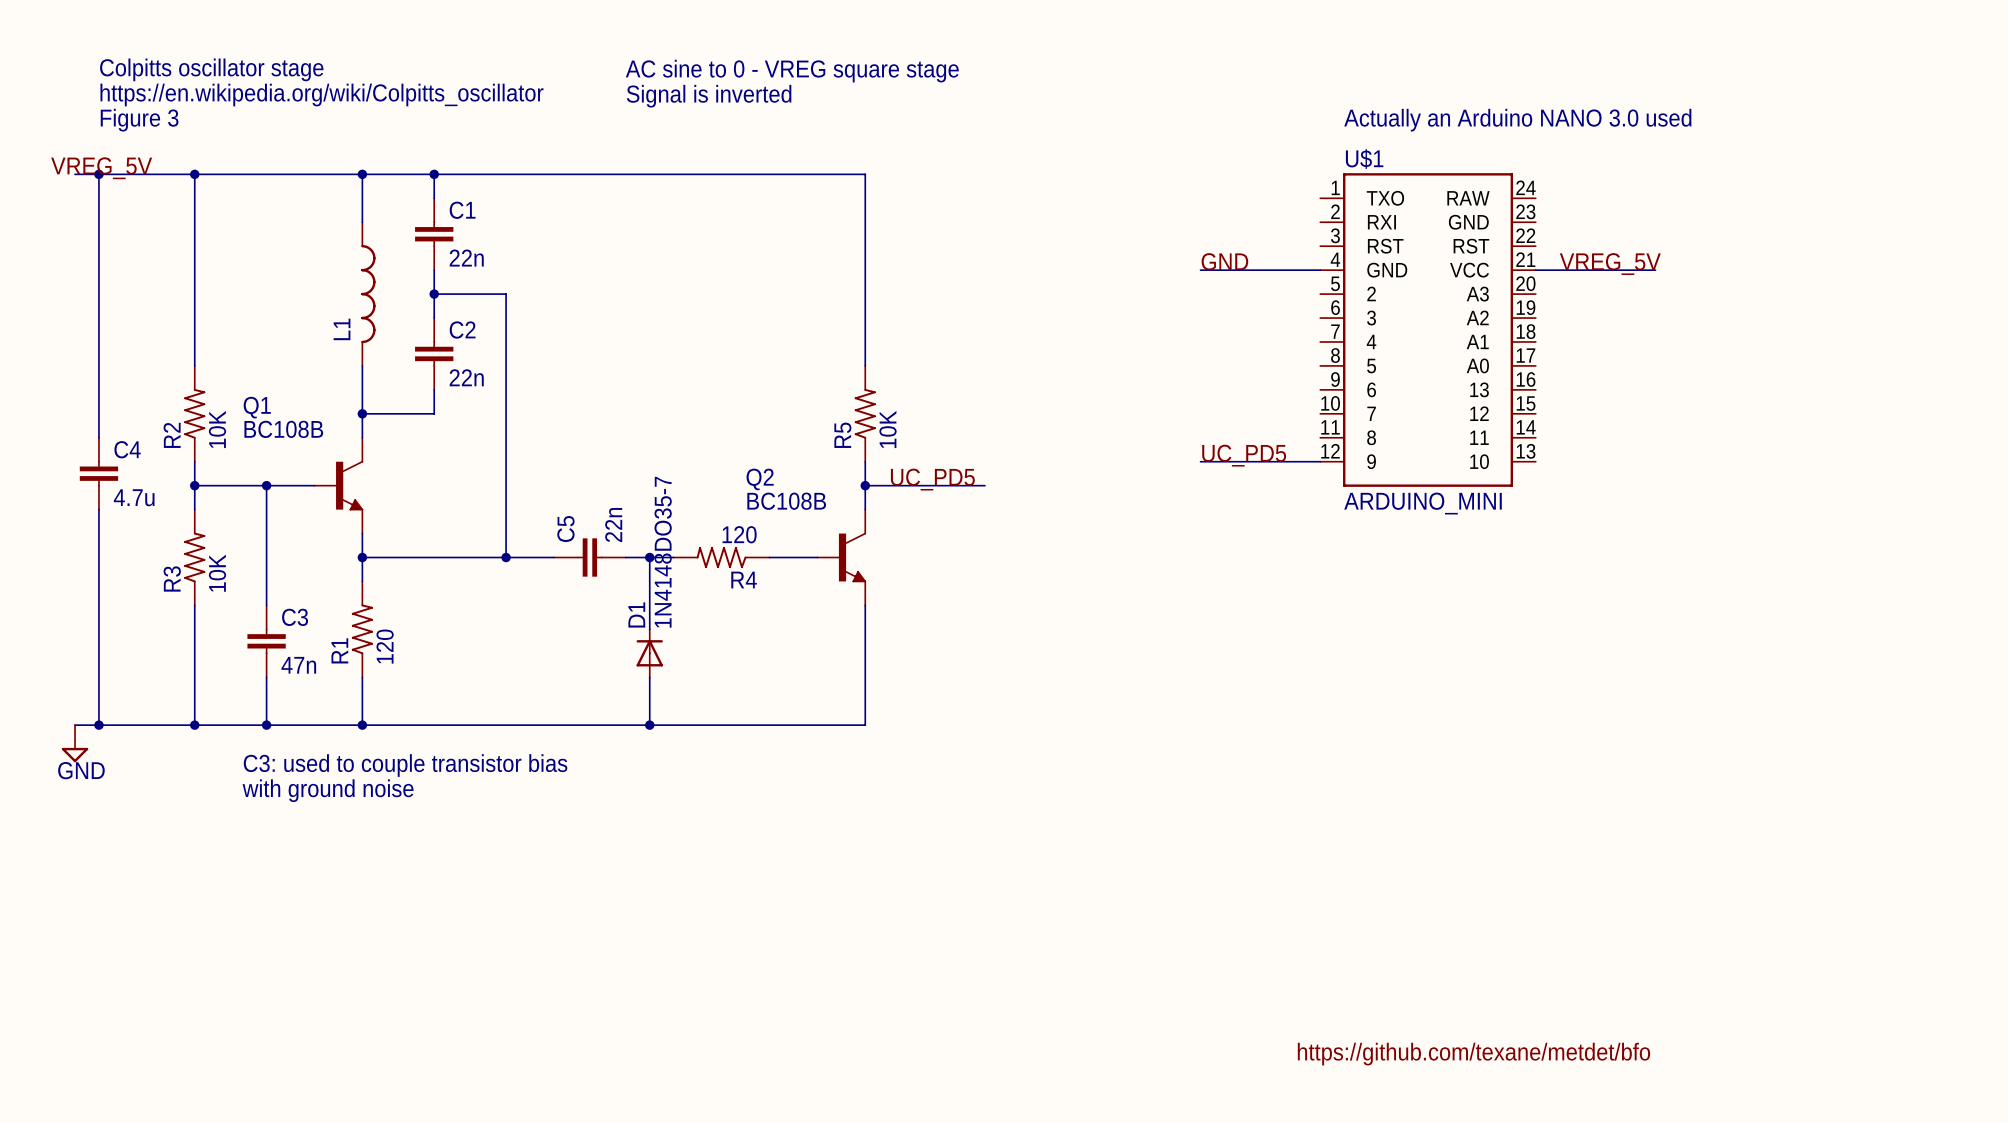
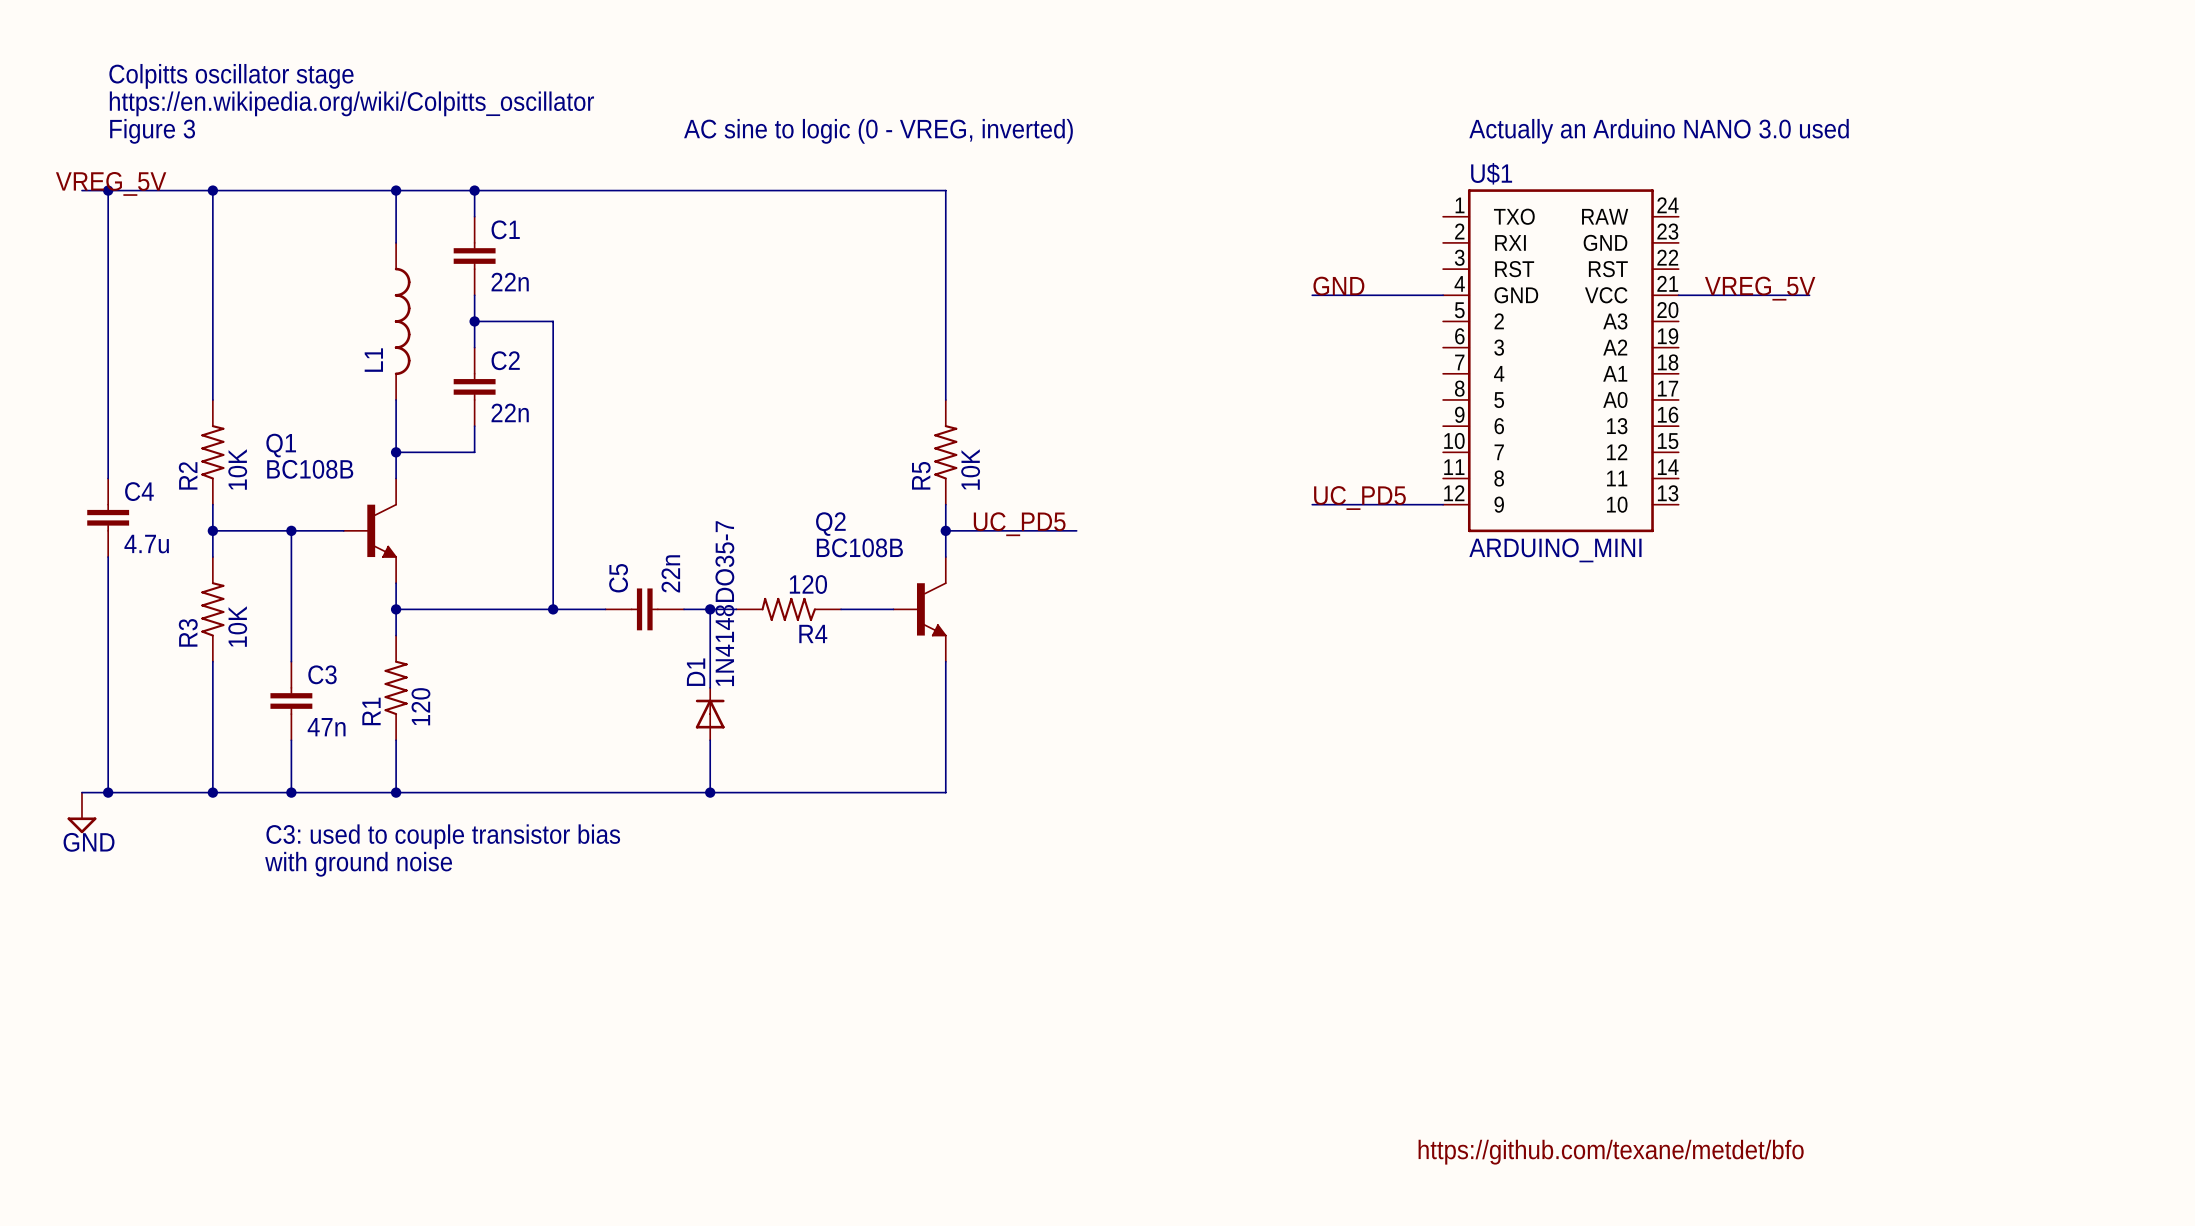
text: AC sine to 0 - VREG square stage (792, 71) -> none
text: Signal is inverted (709, 96) -> none
text: none -> AC sine to logic (0 - VREG, inverted) (878, 131)

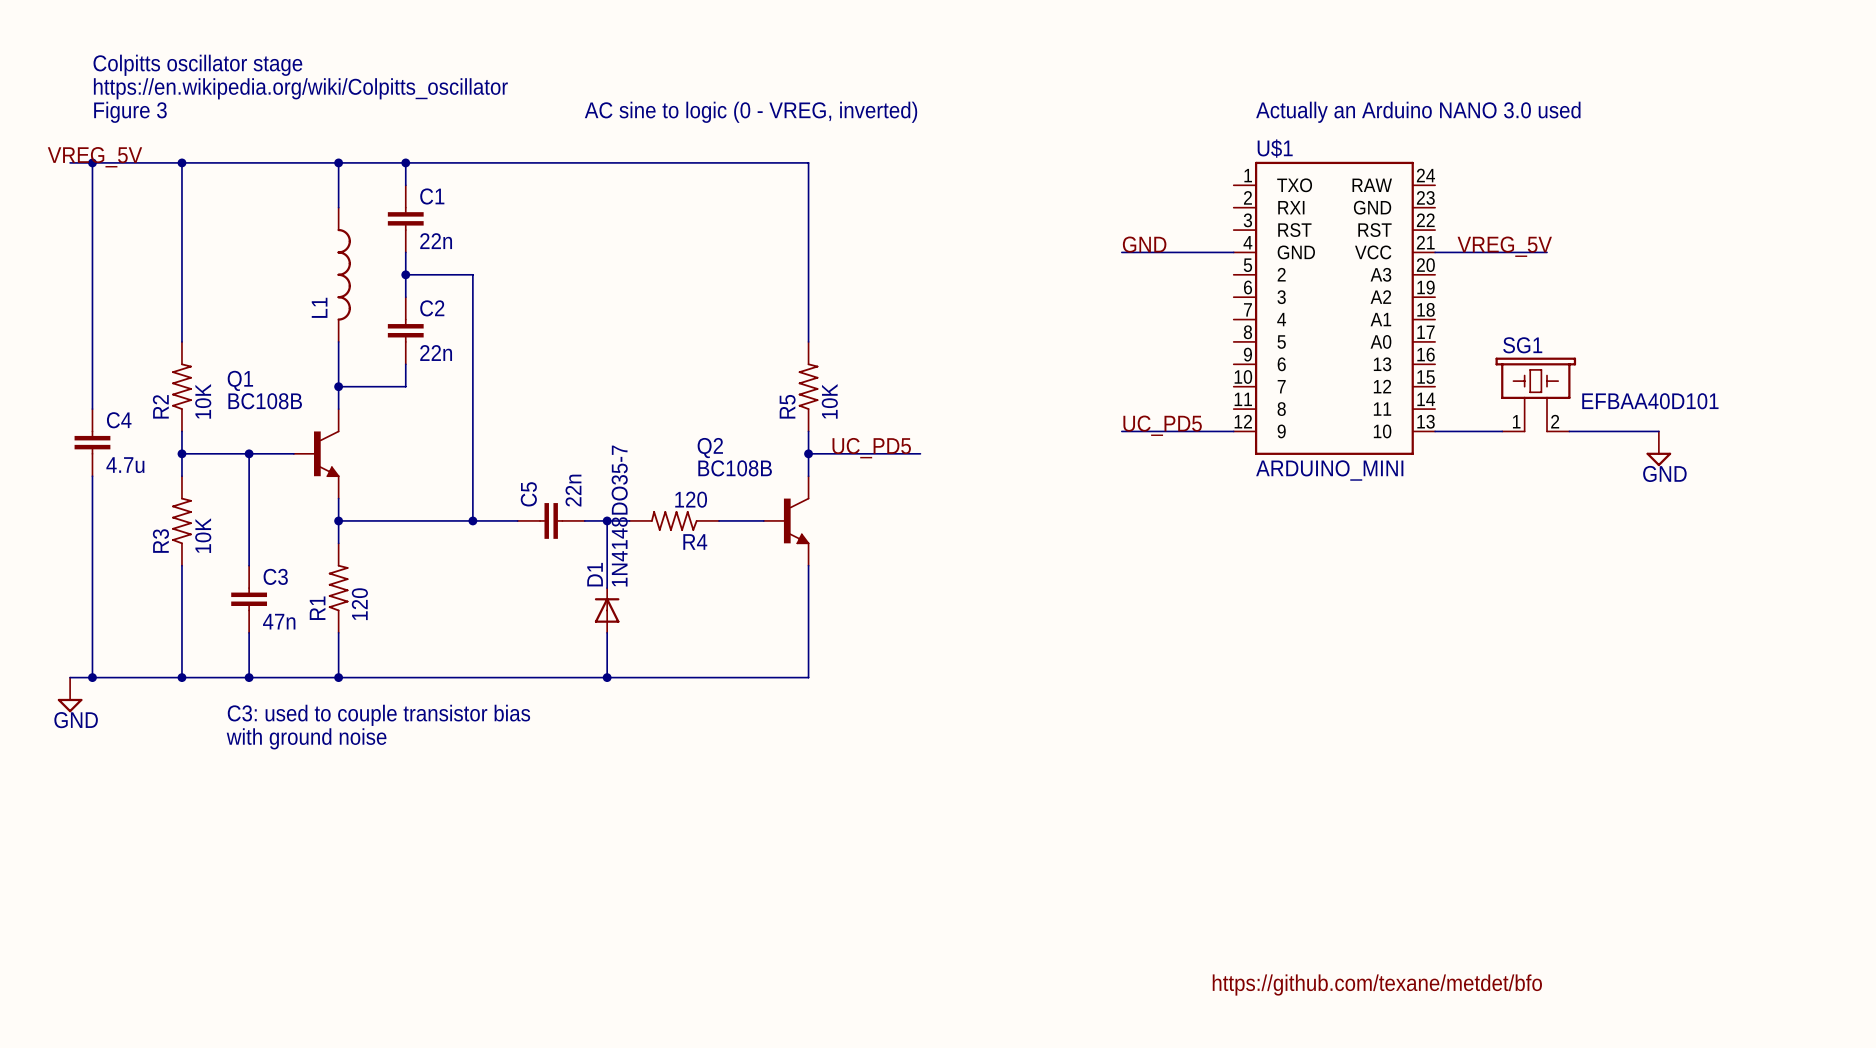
SG1: none -> EFBAA40D101 (1535, 394)
wire: none -> (1435, 431) (1502, 431)
wire: none -> (1569, 431) (1658, 431)
power symbol: none -> GND (1658, 448)

